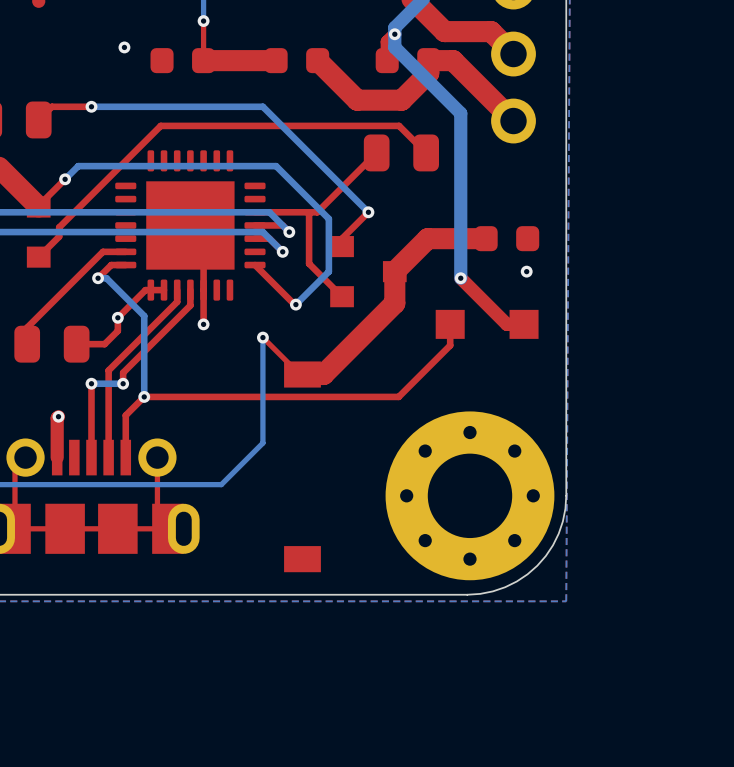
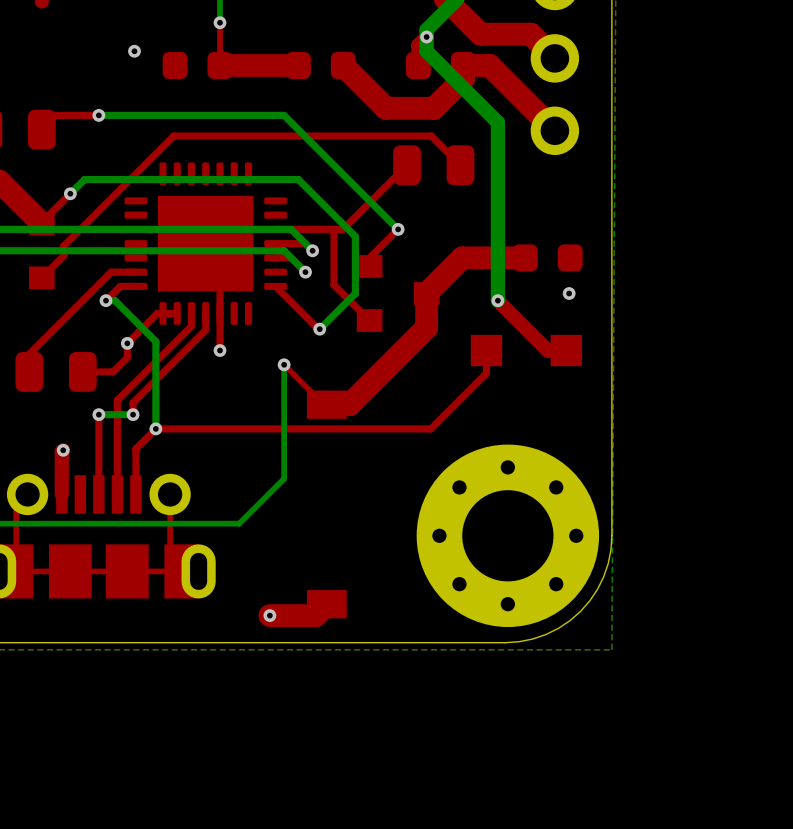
top track: none -> (326, 604) (315, 615) (269, 615)
via: none -> (269, 615)

